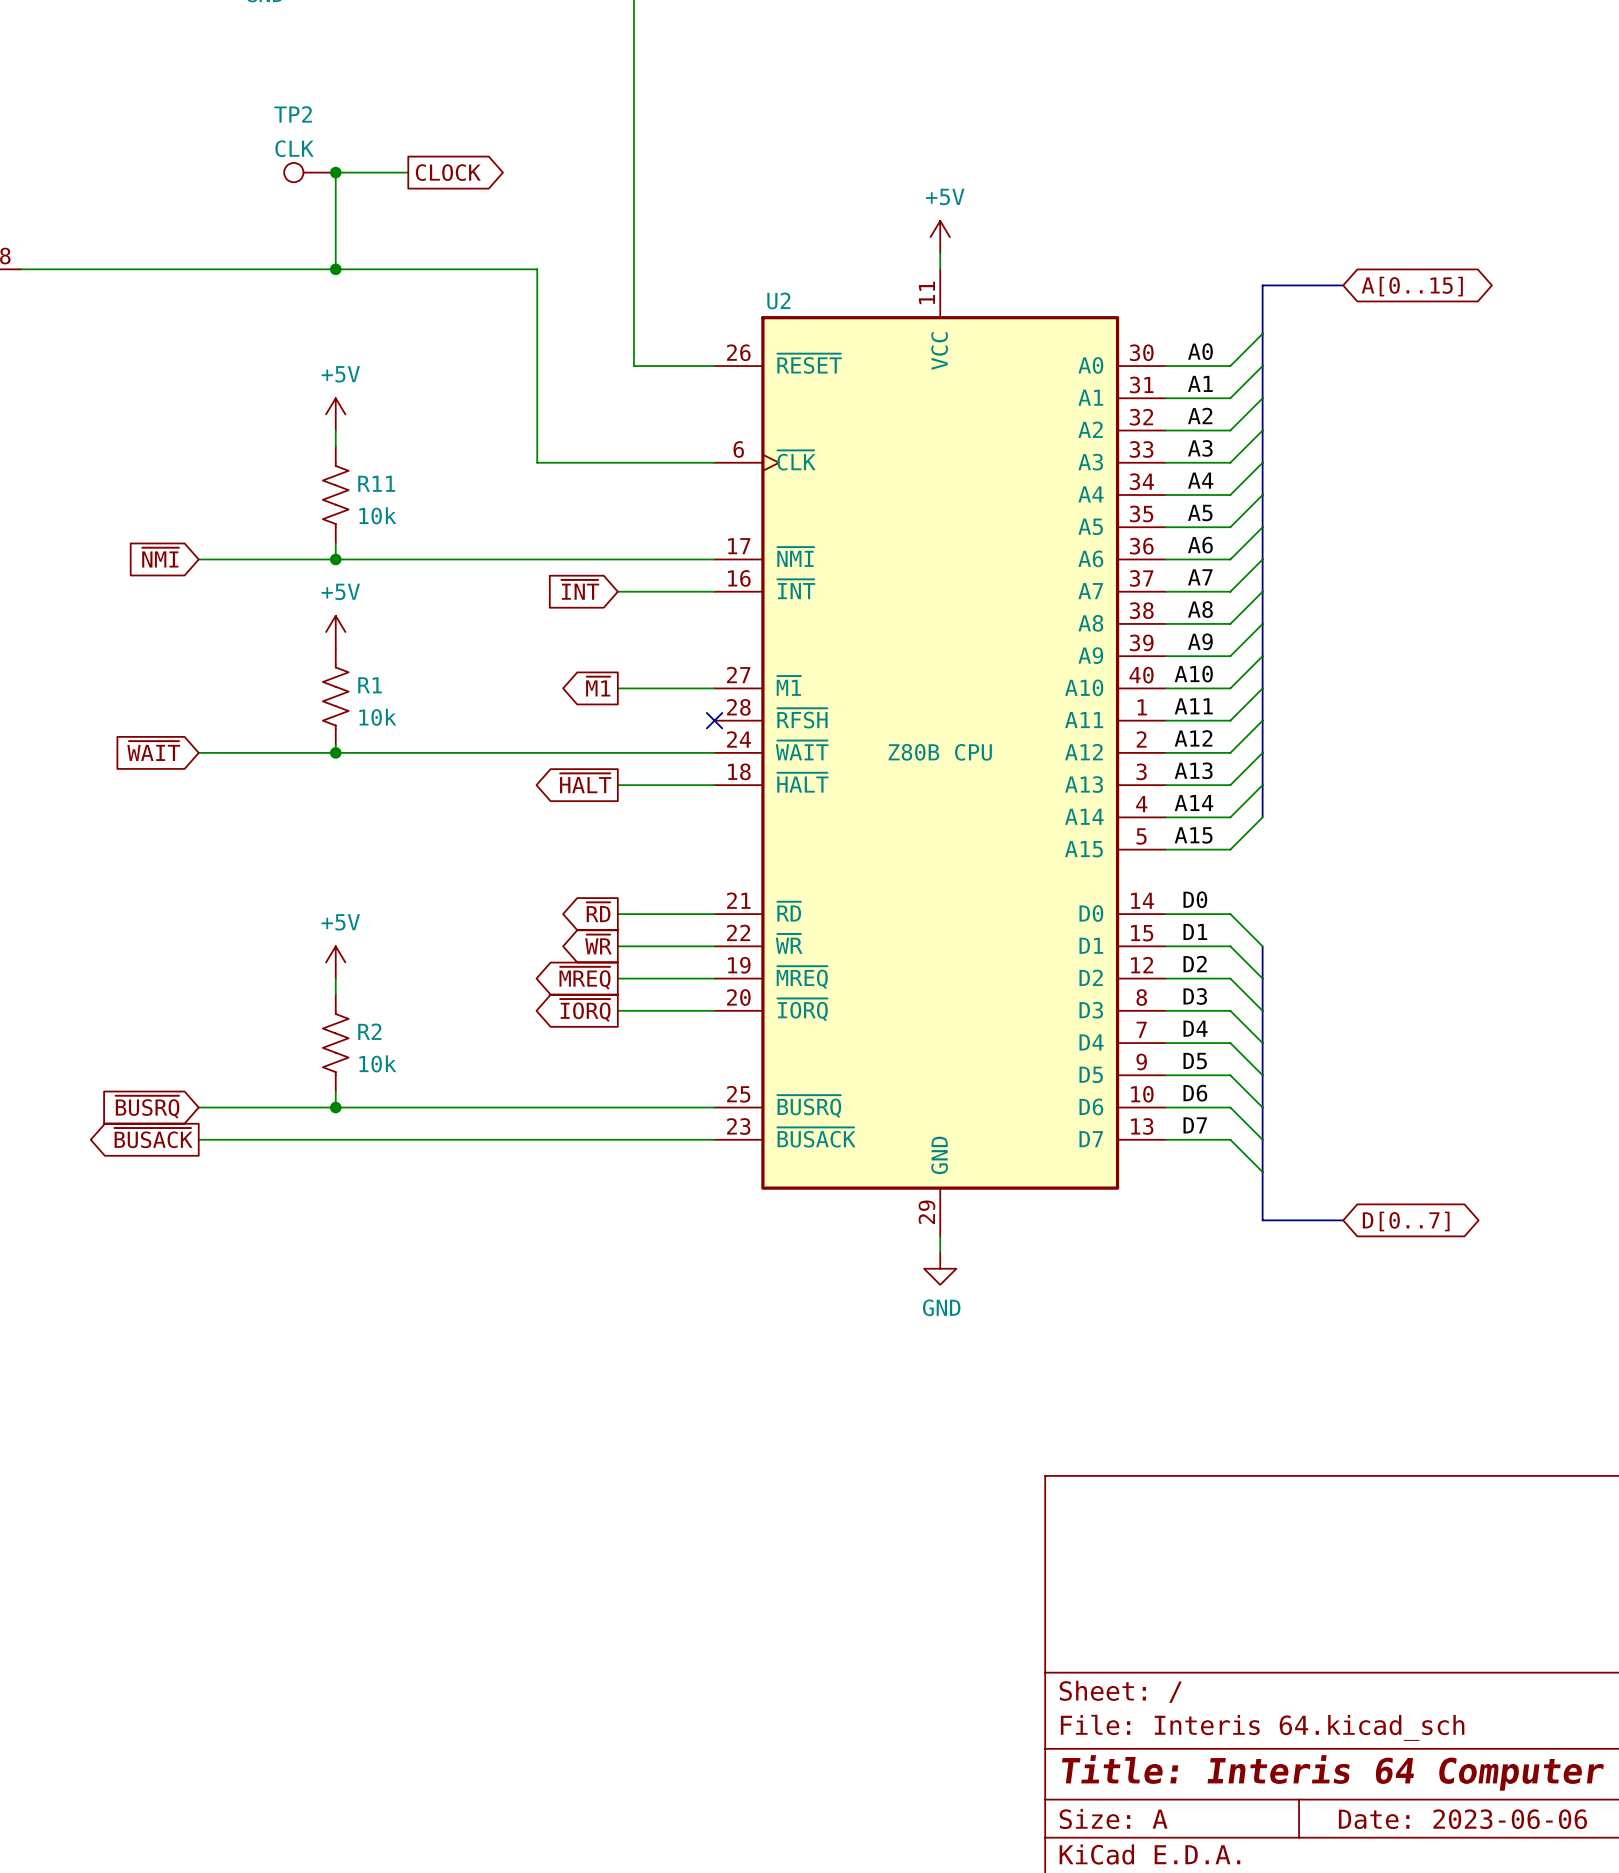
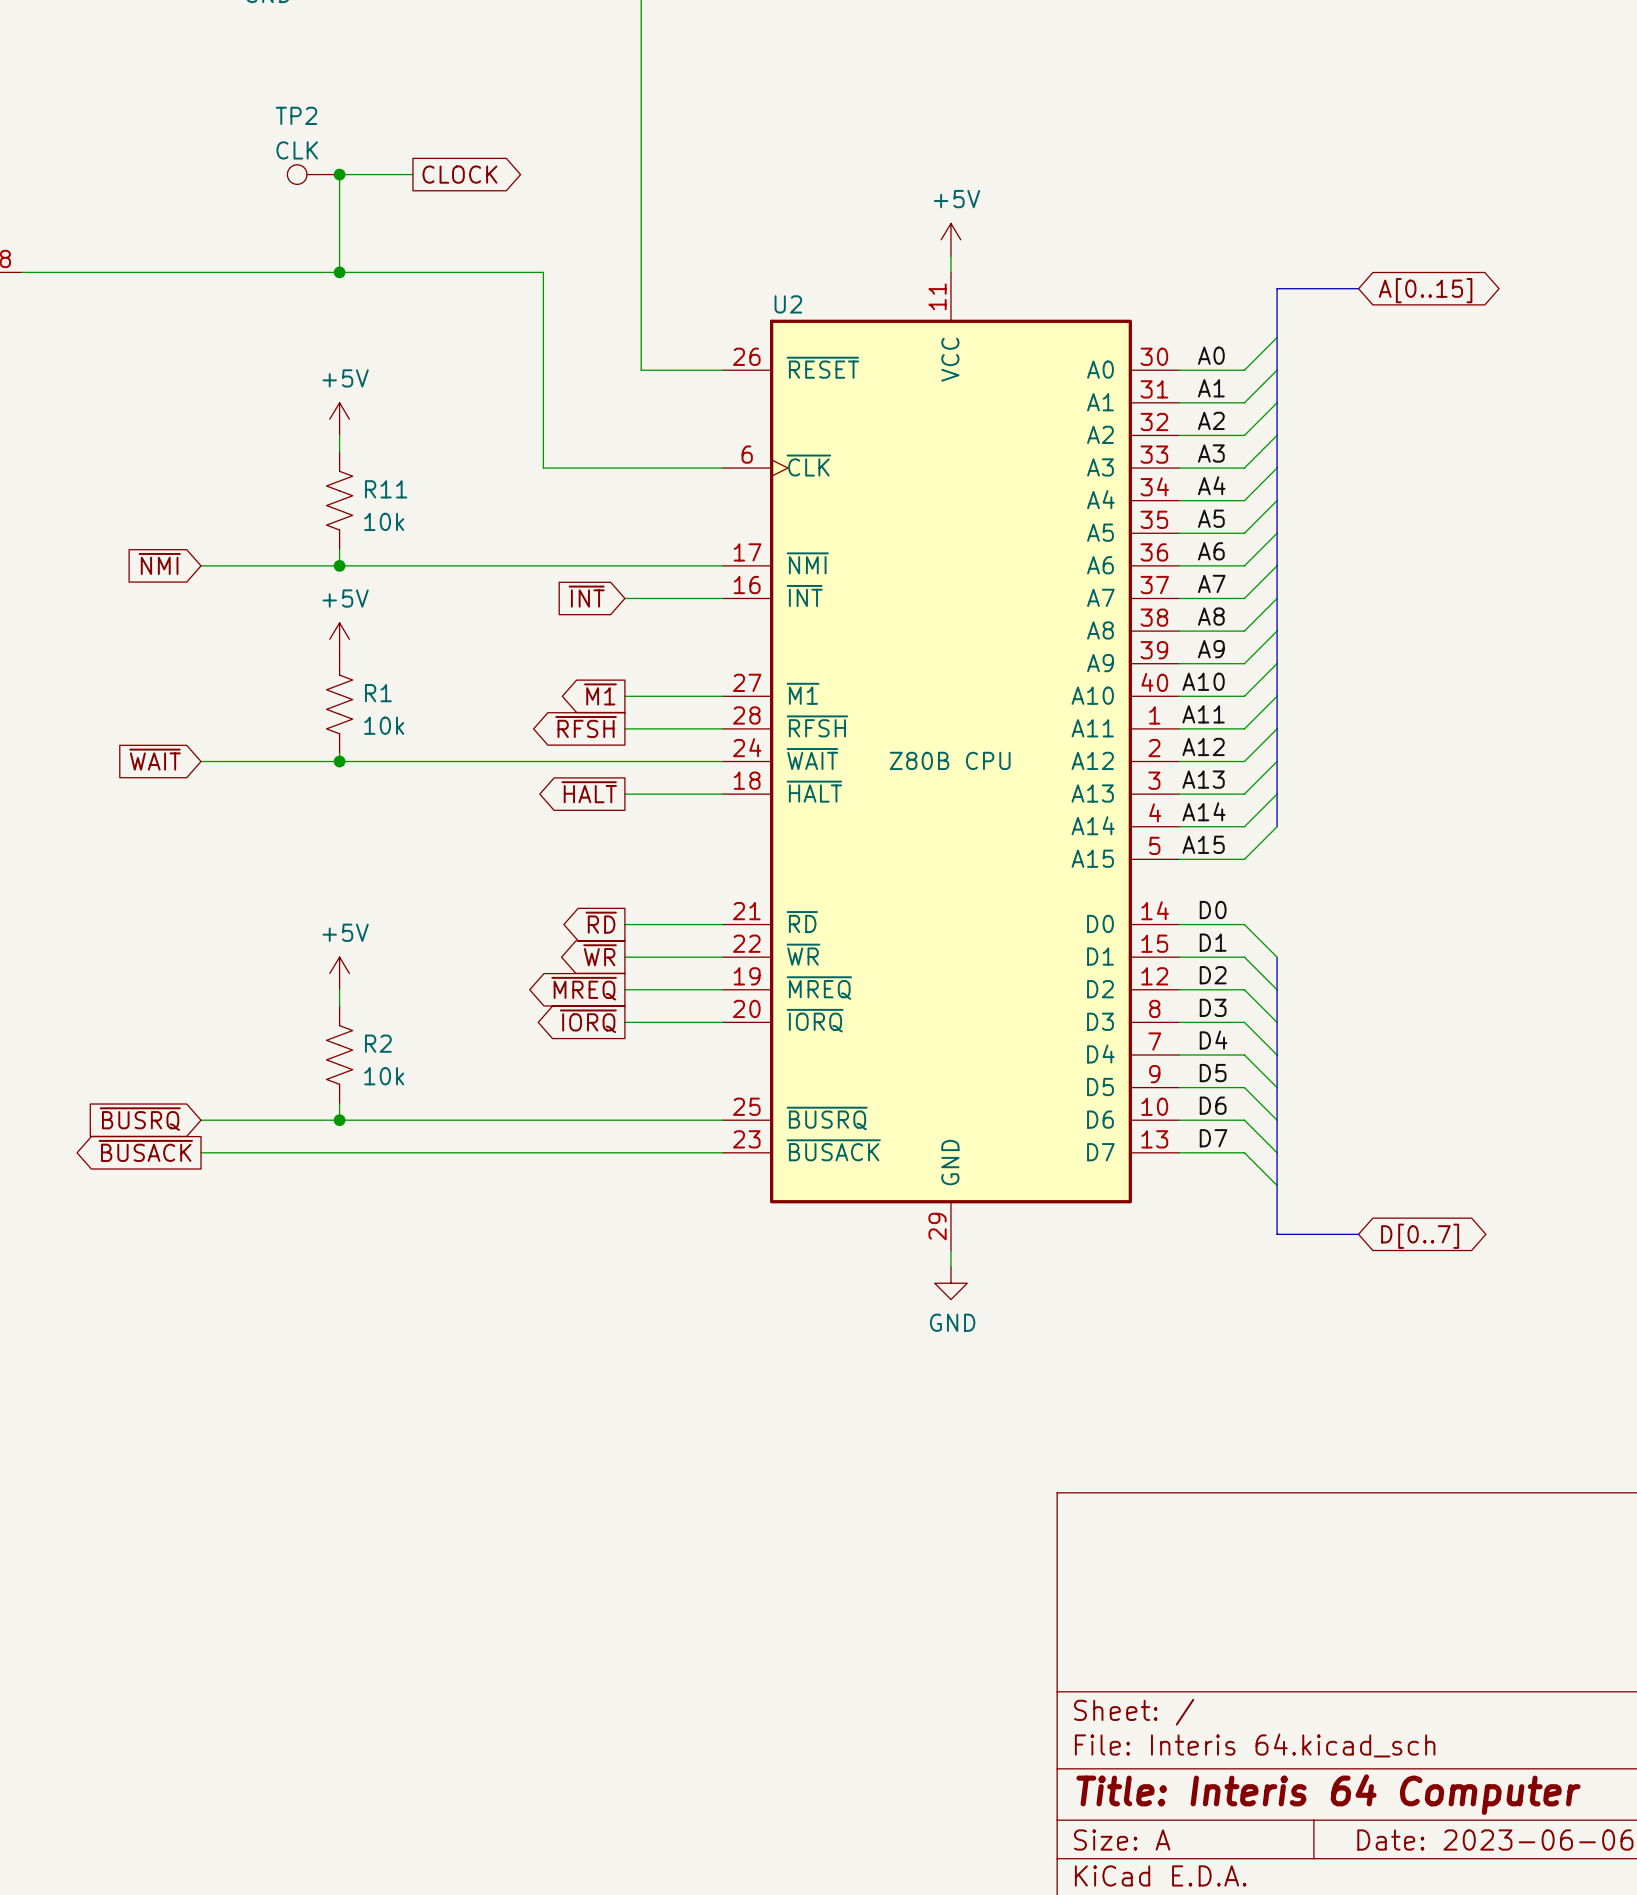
global label: none -> ~{RFSH} (586, 727)
wire: none -> (624, 728) (722, 728)
no-connect mark: (714, 720) -> none

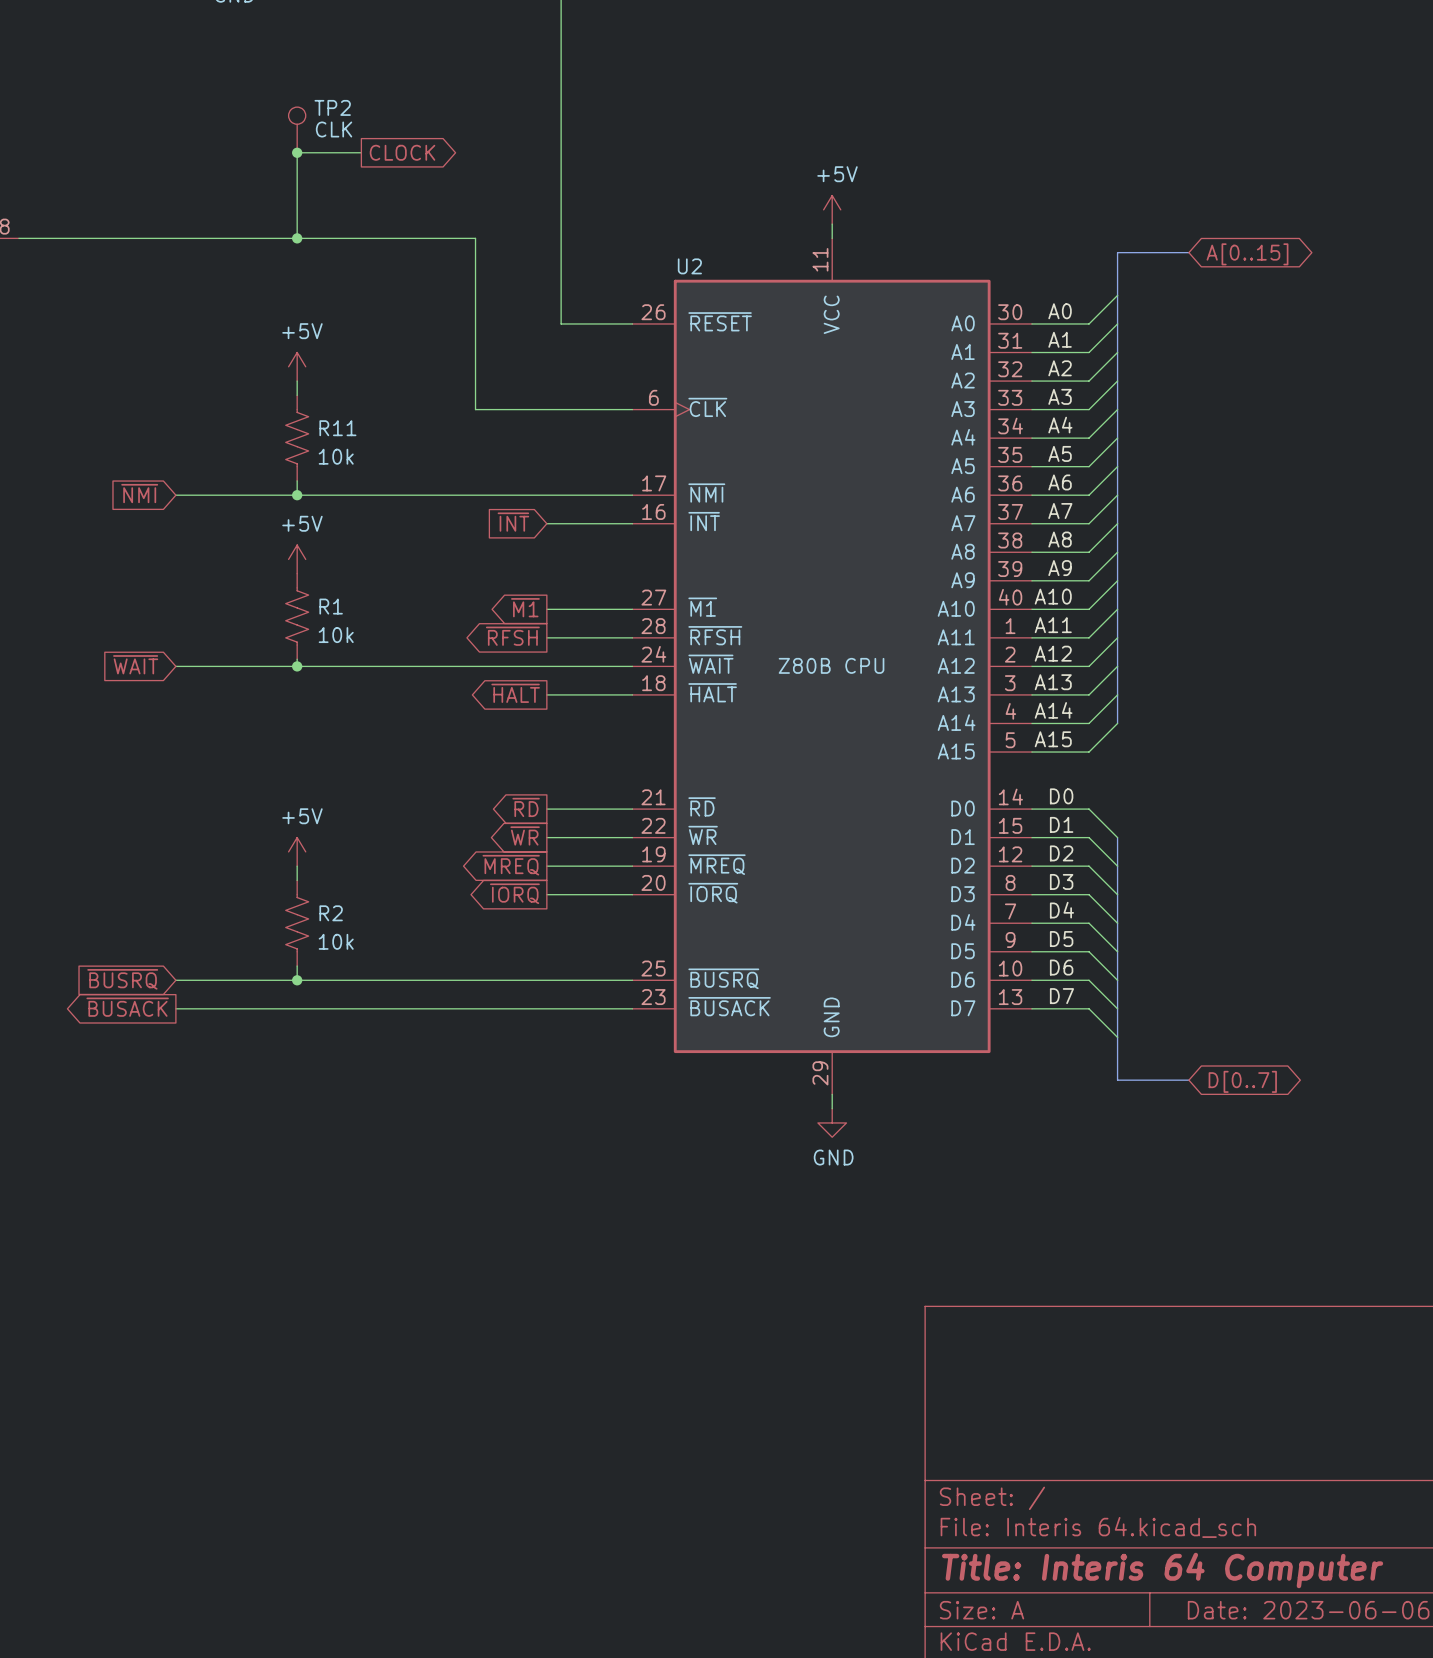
TP2 value position: CLK (297, 150) -> CLK (334, 129)
TP2 rotation: 0° (297, 174) -> 90° clockwise (297, 115)
TP2 position: (313, 174) -> (297, 129)

